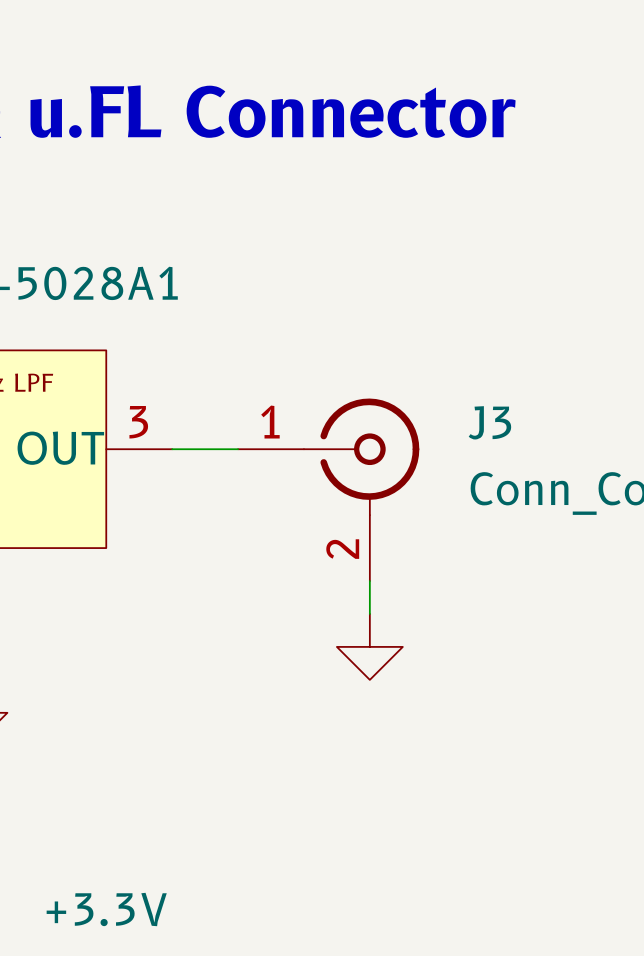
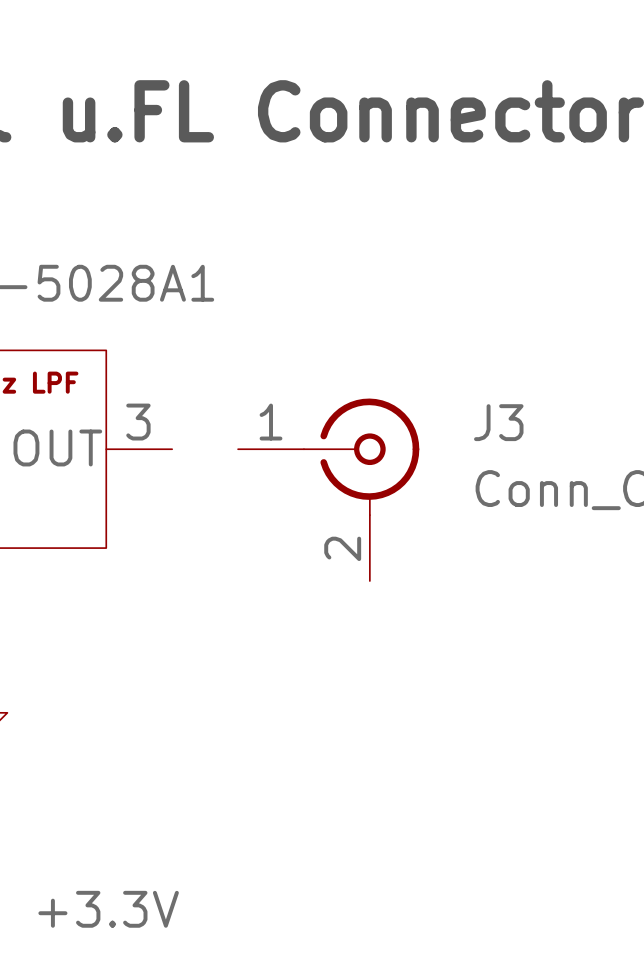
wire: (172, 449) (238, 449) -> none
wire: (369, 581) (369, 613) -> none
power symbol: (369, 646) -> none

